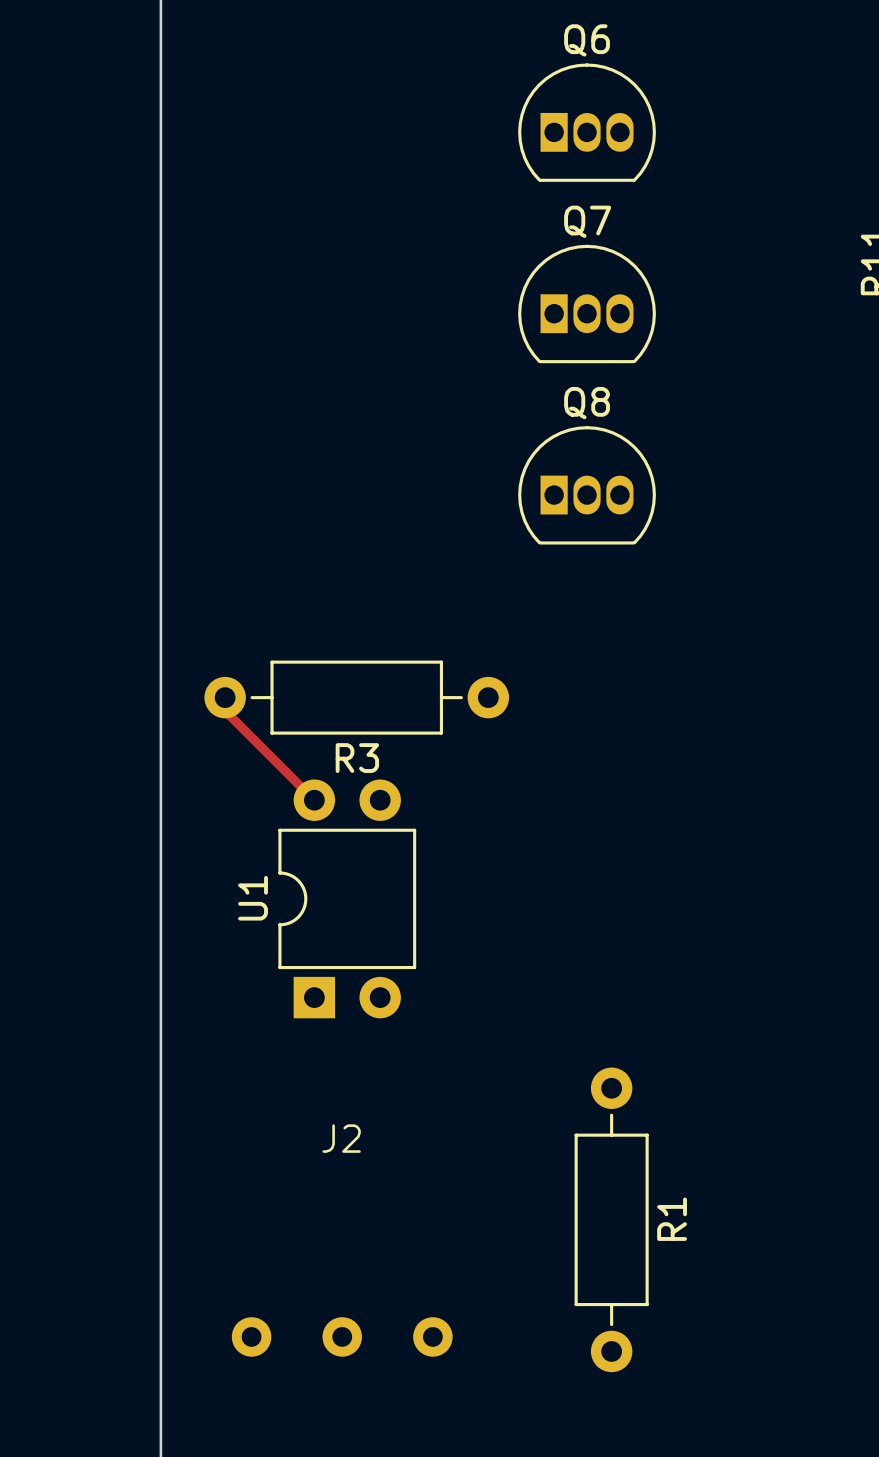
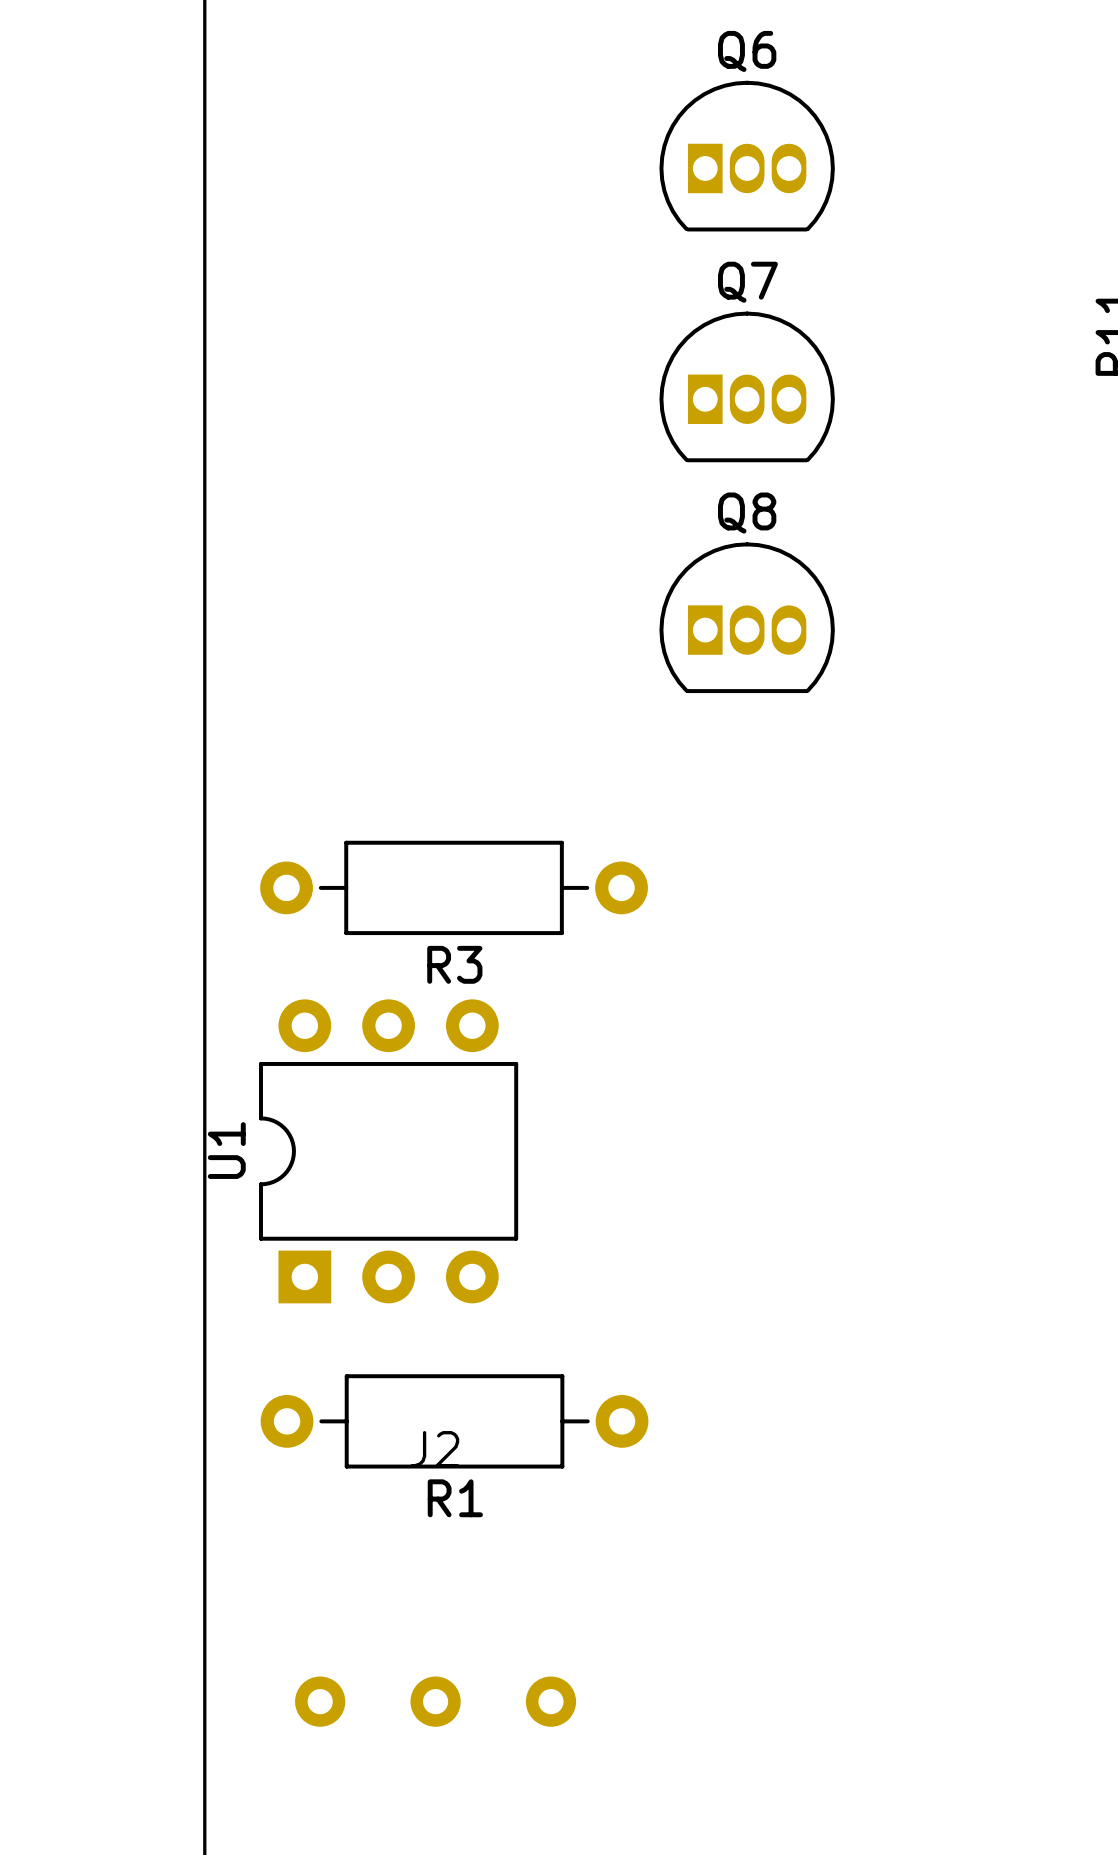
track: (225, 697) (225, 710) (314, 800) -> none
U1 footprint: [278, 779, 417, 1019] -> [259, 999, 519, 1304]
R1 rotation: 0° (611, 1219) -> 90° clockwise (454, 1421)
R1 position: (611, 1219) -> (454, 1421)

